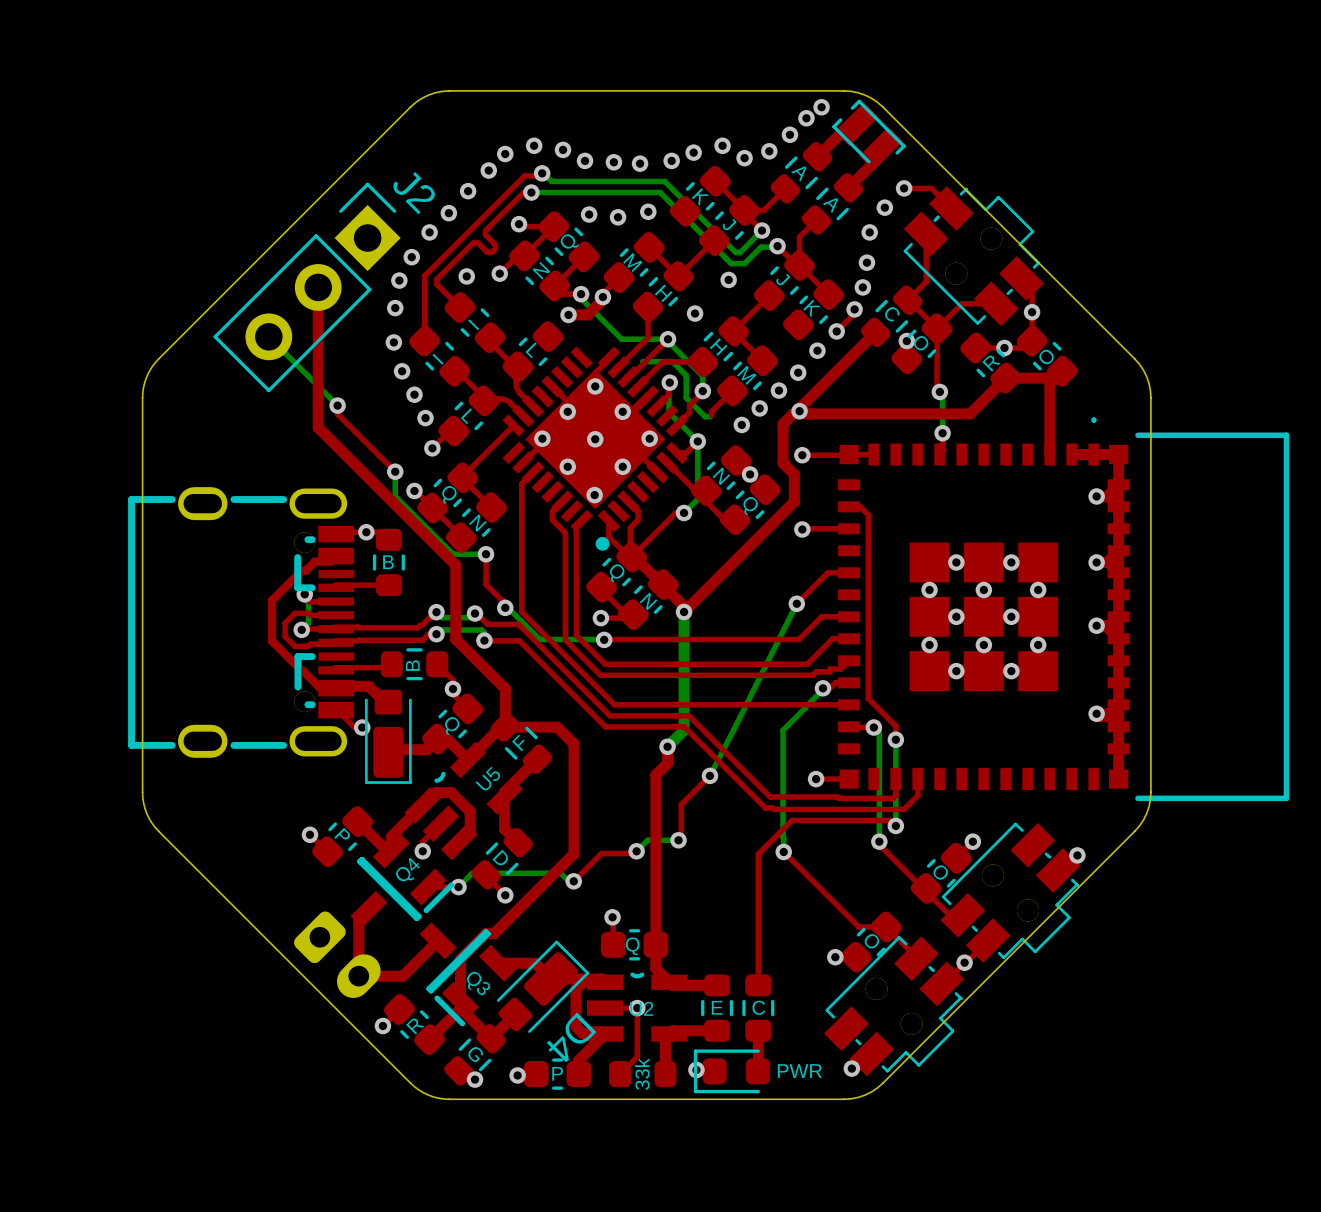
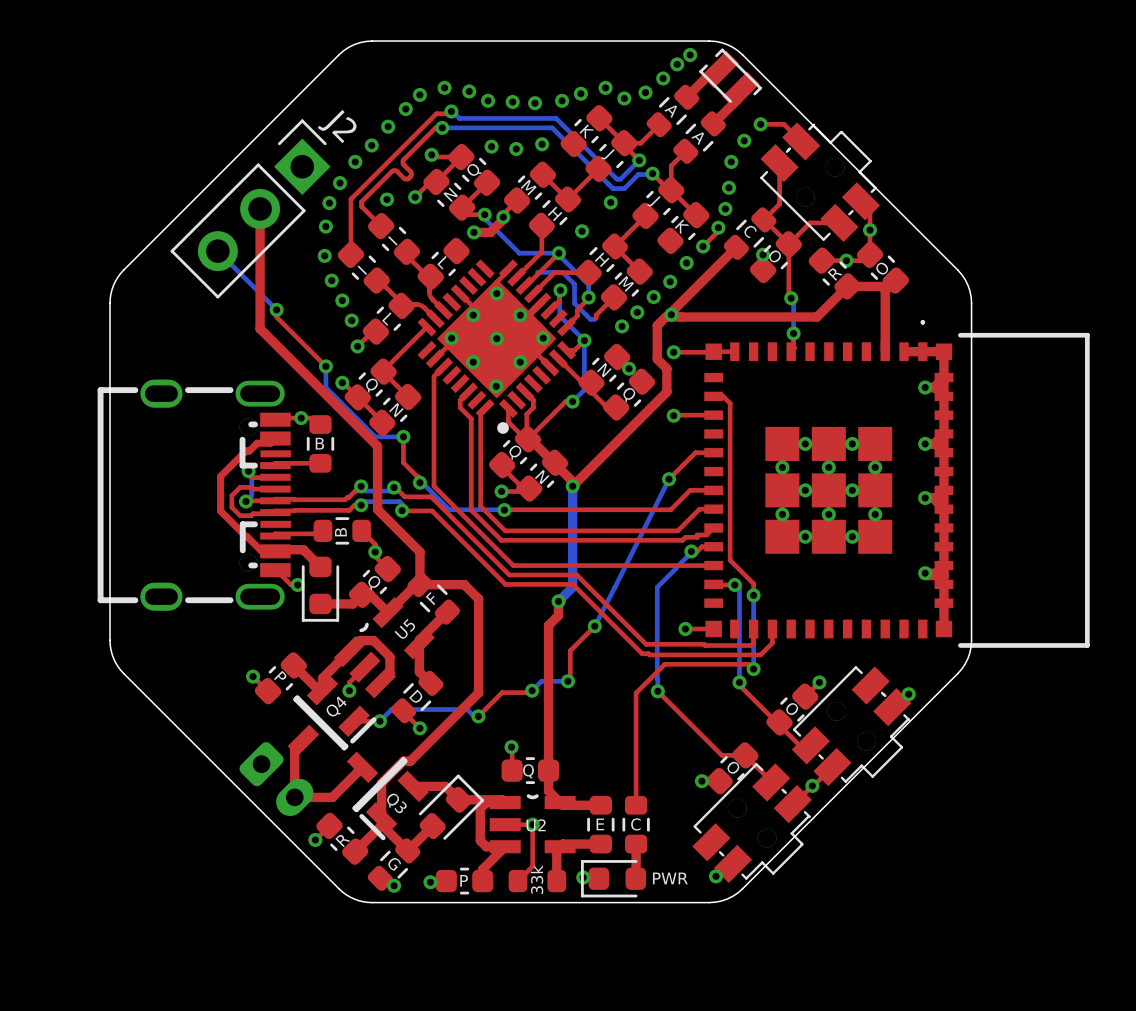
part footprint: [364, 689, 412, 784] -> [301, 556, 340, 622]
D4: (543, 986) -> none
part: none -> (451, 807)

